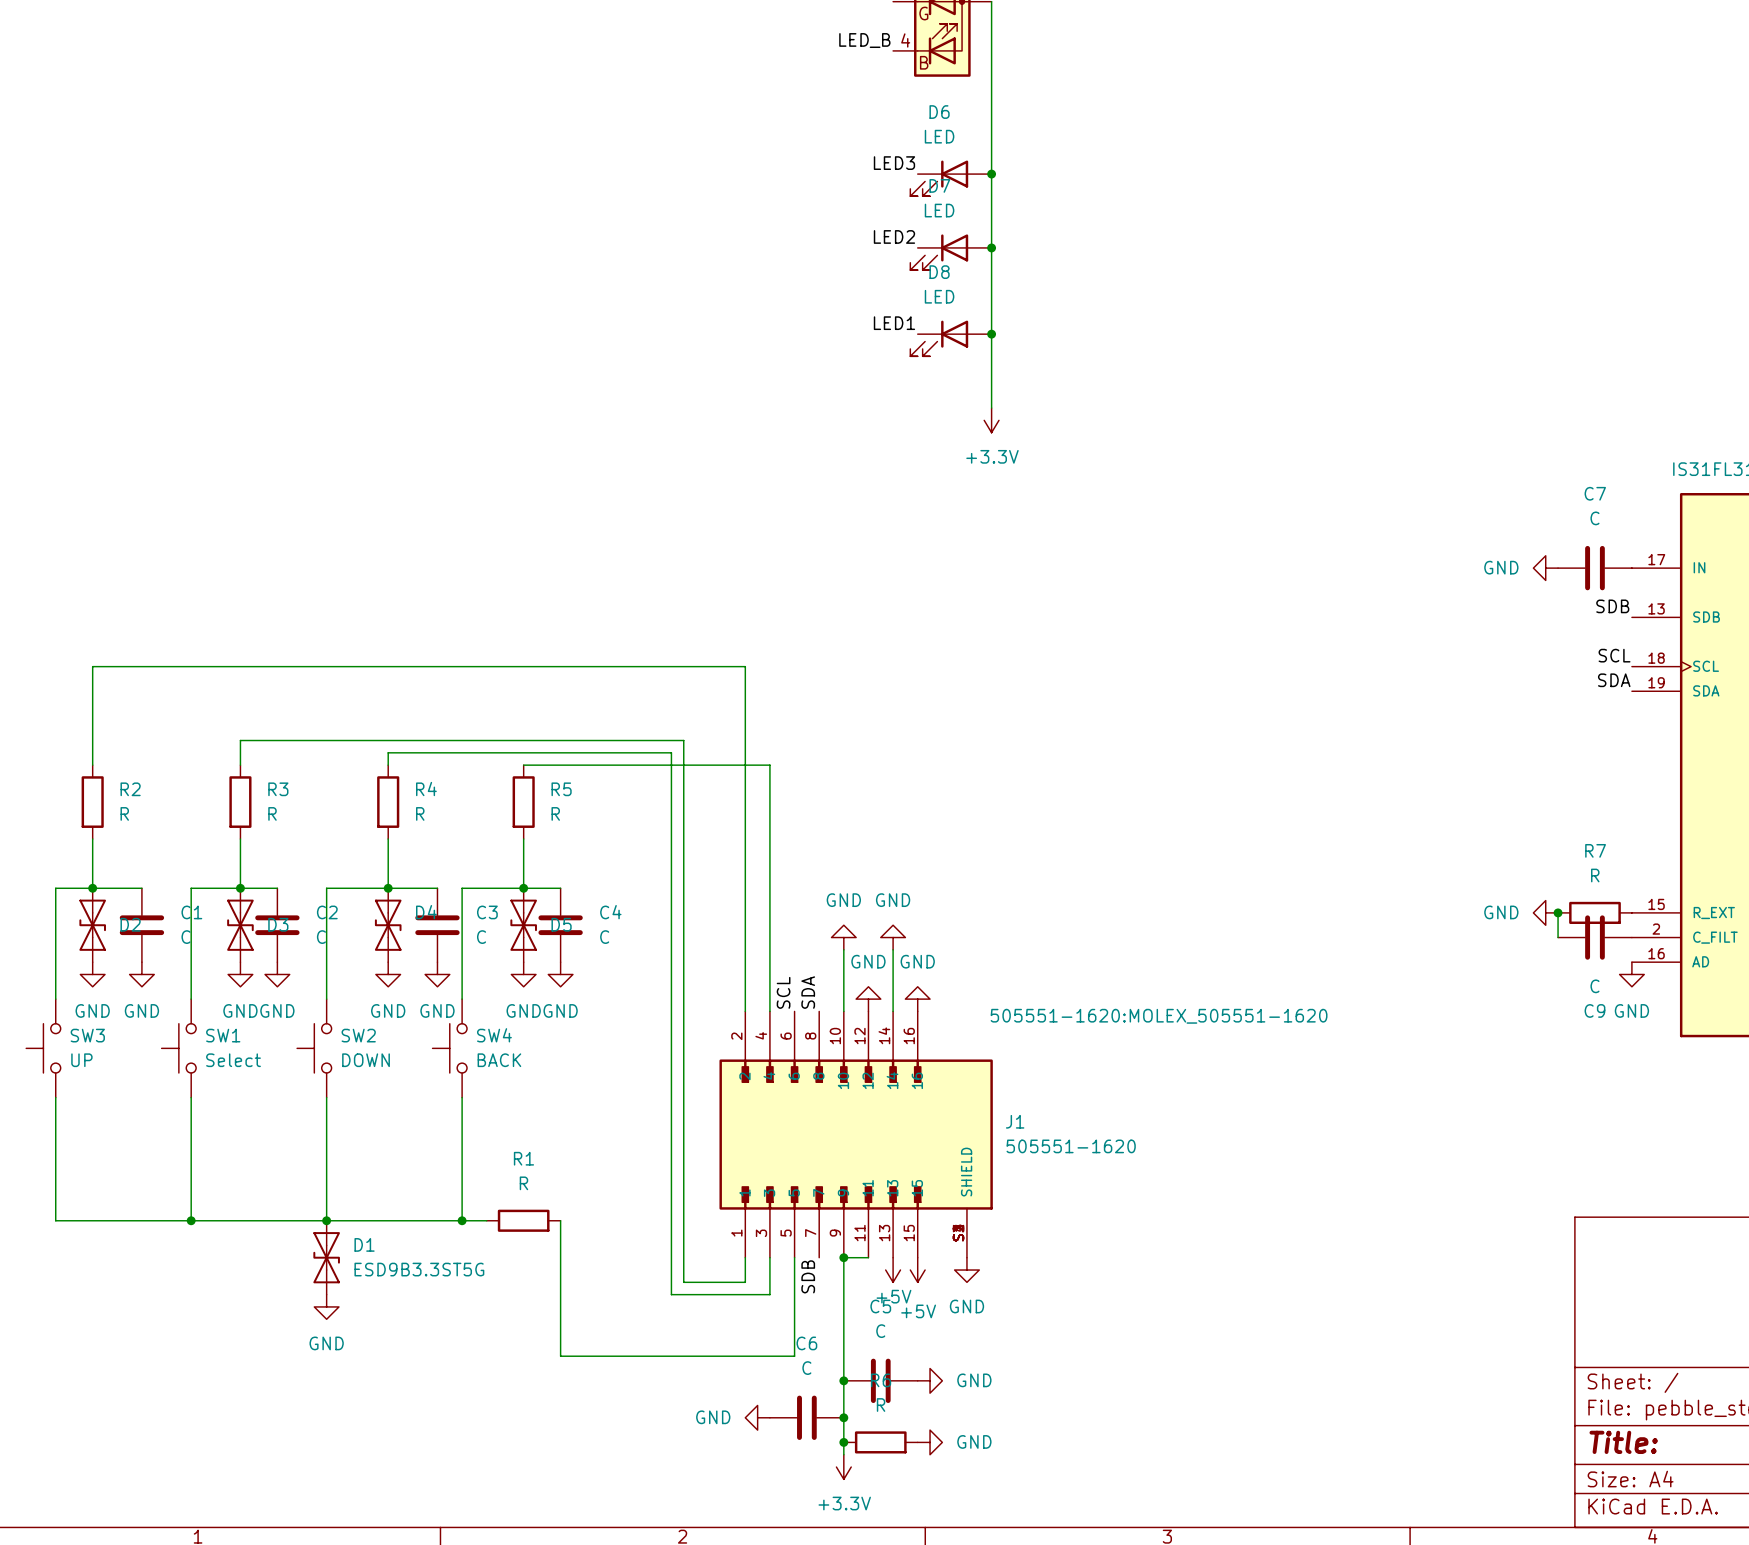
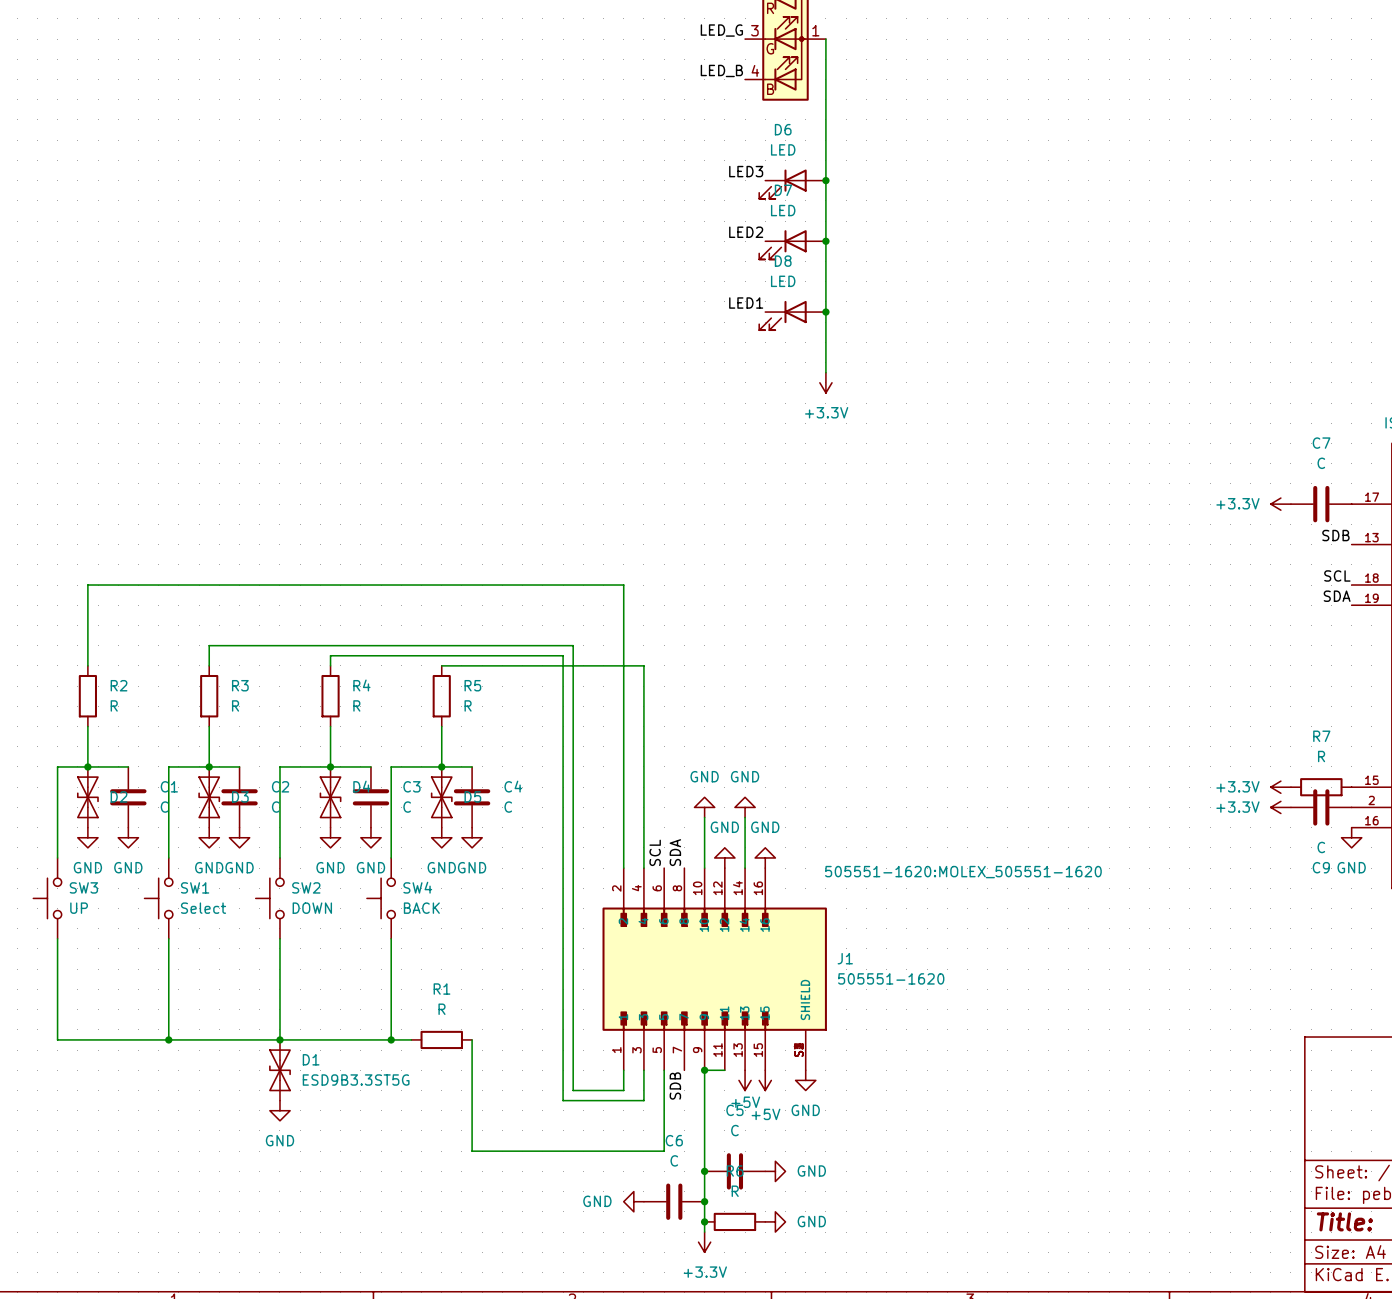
power symbol: GND (1545, 568) -> +3.3V (1280, 504)
power symbol: GND (1545, 912) -> +3.3V (1280, 787)
wire: (1558, 912) (1558, 937) -> none
junction: (1558, 912) -> none
power symbol: none -> +3.3V (1280, 807)

